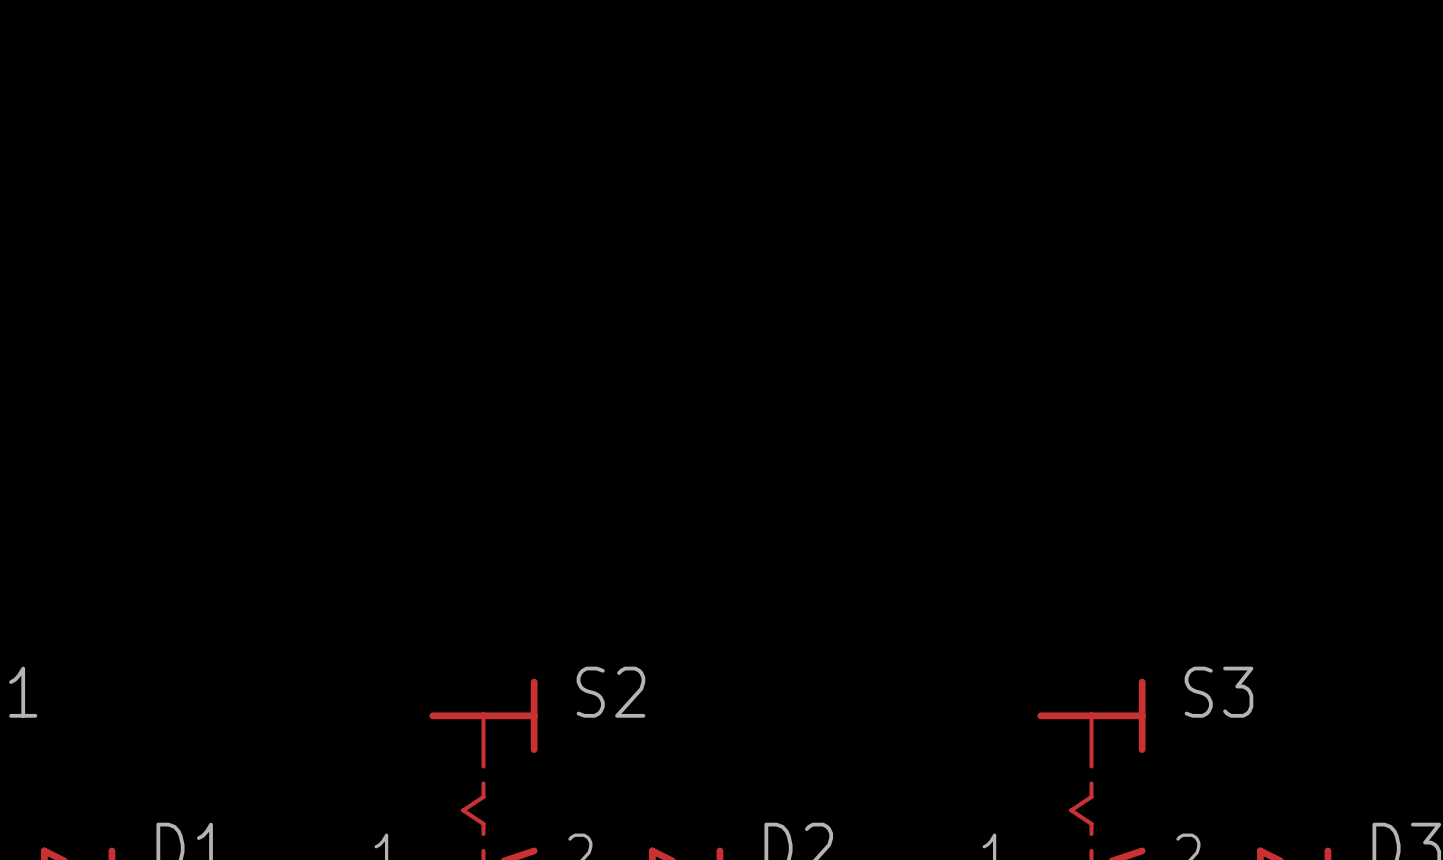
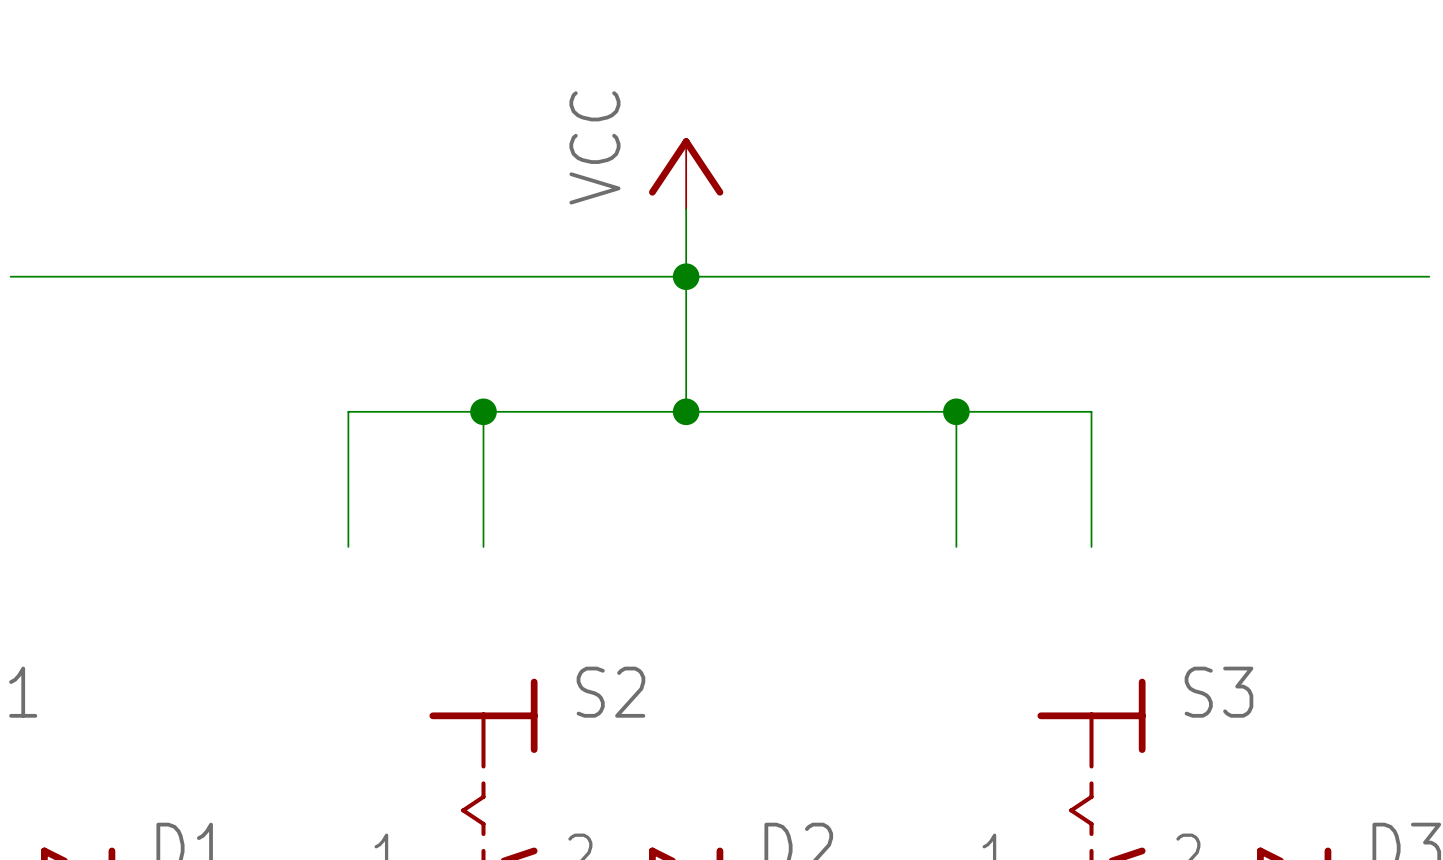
power symbol: none -> VCC (686, 173)
wire: none -> (686, 209) (686, 411)
wire: none -> (10, 276) (1429, 276)
junction: none -> (686, 276)
wire: none -> (483, 411) (483, 546)
junction: none -> (483, 411)
junction: none -> (686, 411)
wire: none -> (956, 411) (956, 546)
junction: none -> (956, 411)
wire: none -> (348, 546) (348, 411) (1091, 411) (1091, 546)

